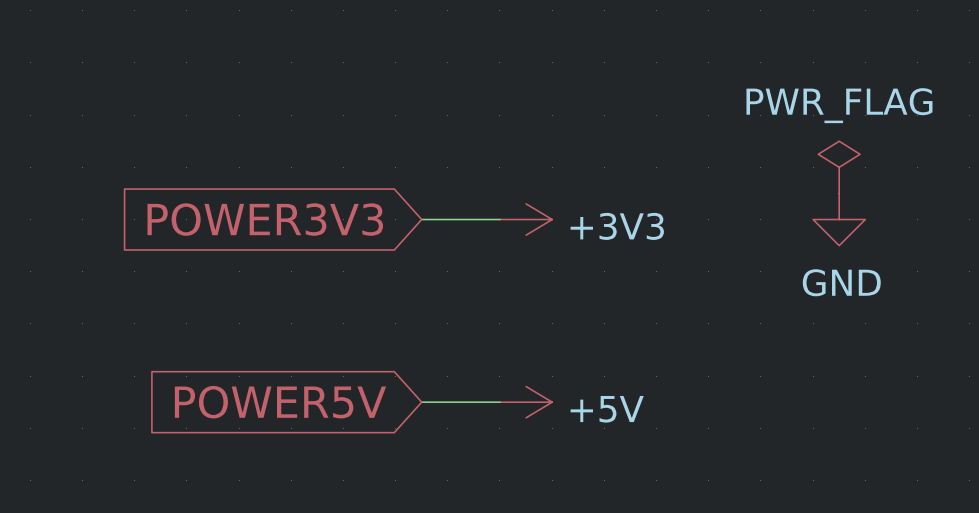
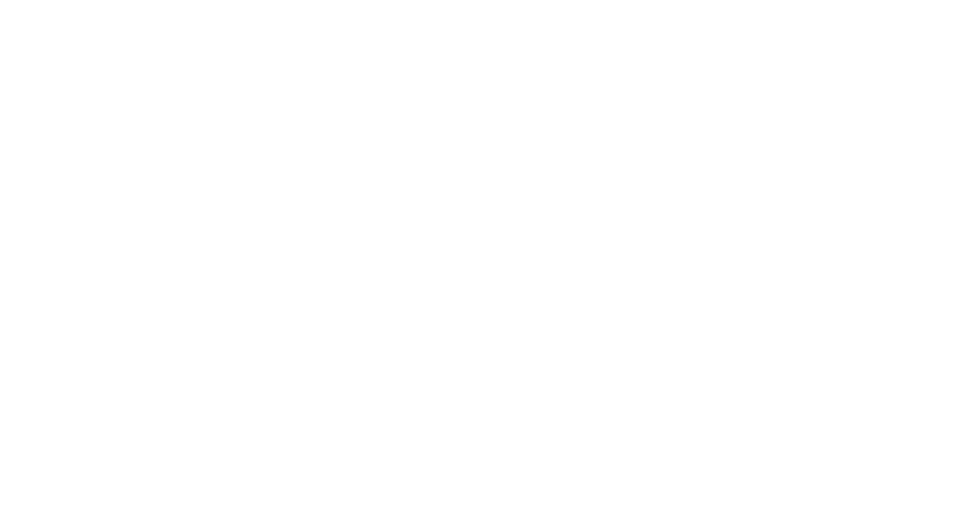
power symbol: PWR_FLAG (839, 167) -> none
global label: POWER3V3 (265, 219) -> none
wire: (421, 219) (499, 219) -> none
power symbol: +3V3 (526, 219) -> none
power symbol: GND (839, 219) -> none
global label: POWER5V (280, 402) -> none
wire: (421, 402) (499, 402) -> none
power symbol: +5V (526, 402) -> none

